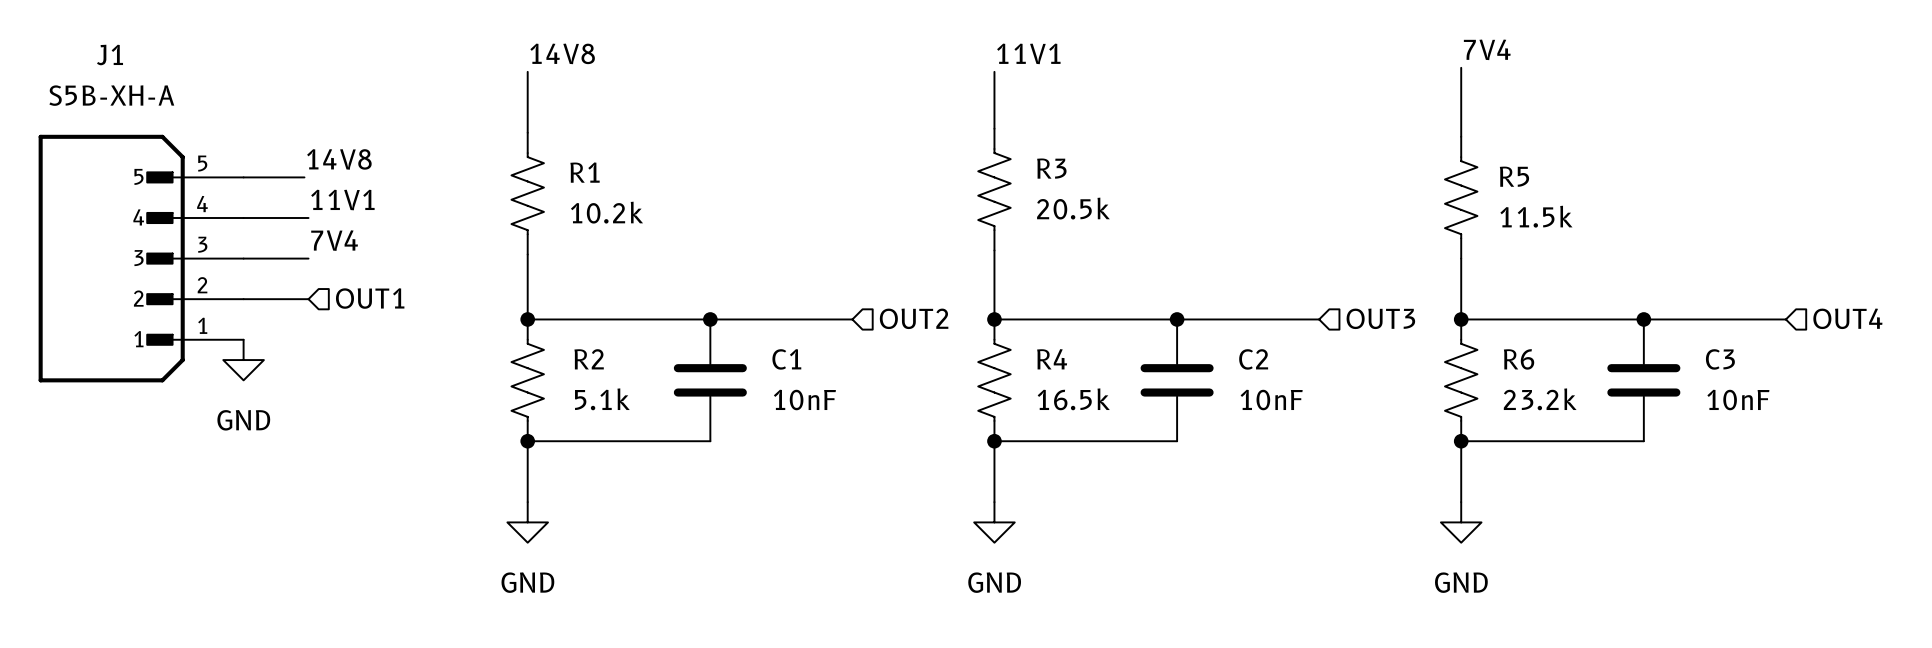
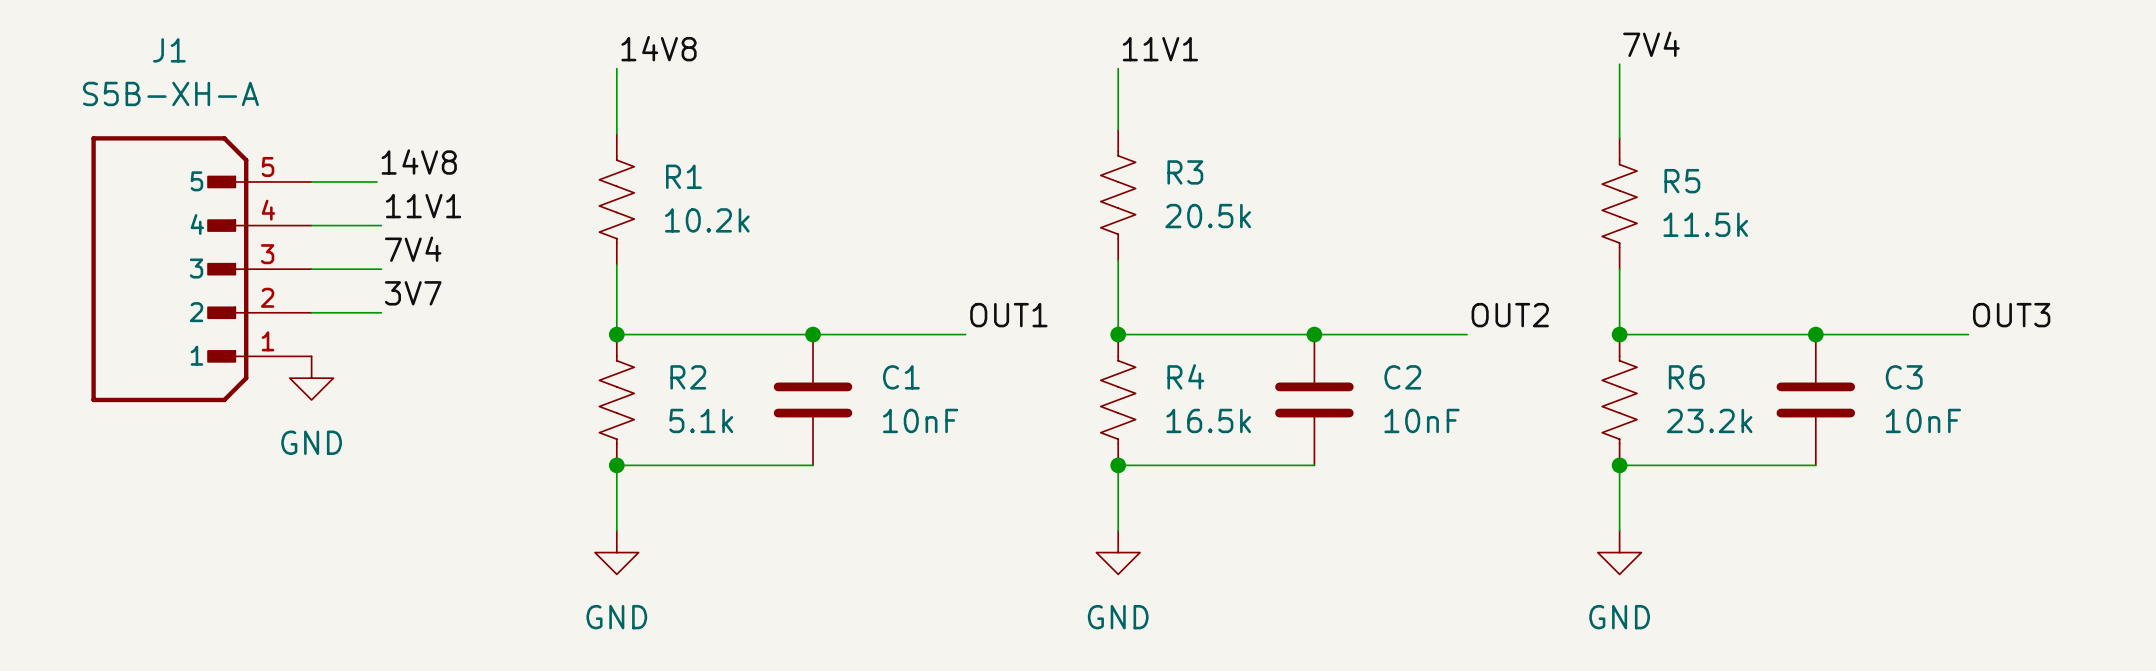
label: none -> 3V7 (413, 293)
hierarchical label: OUT1 (370, 298) -> none
label: none -> OUT1 (1008, 315)
label: none -> OUT2 (1510, 315)
label: none -> OUT3 (2011, 315)
hierarchical label: OUT2 (914, 318) -> none
hierarchical label: OUT3 (1380, 318) -> none
hierarchical label: OUT4 (1847, 318) -> none

